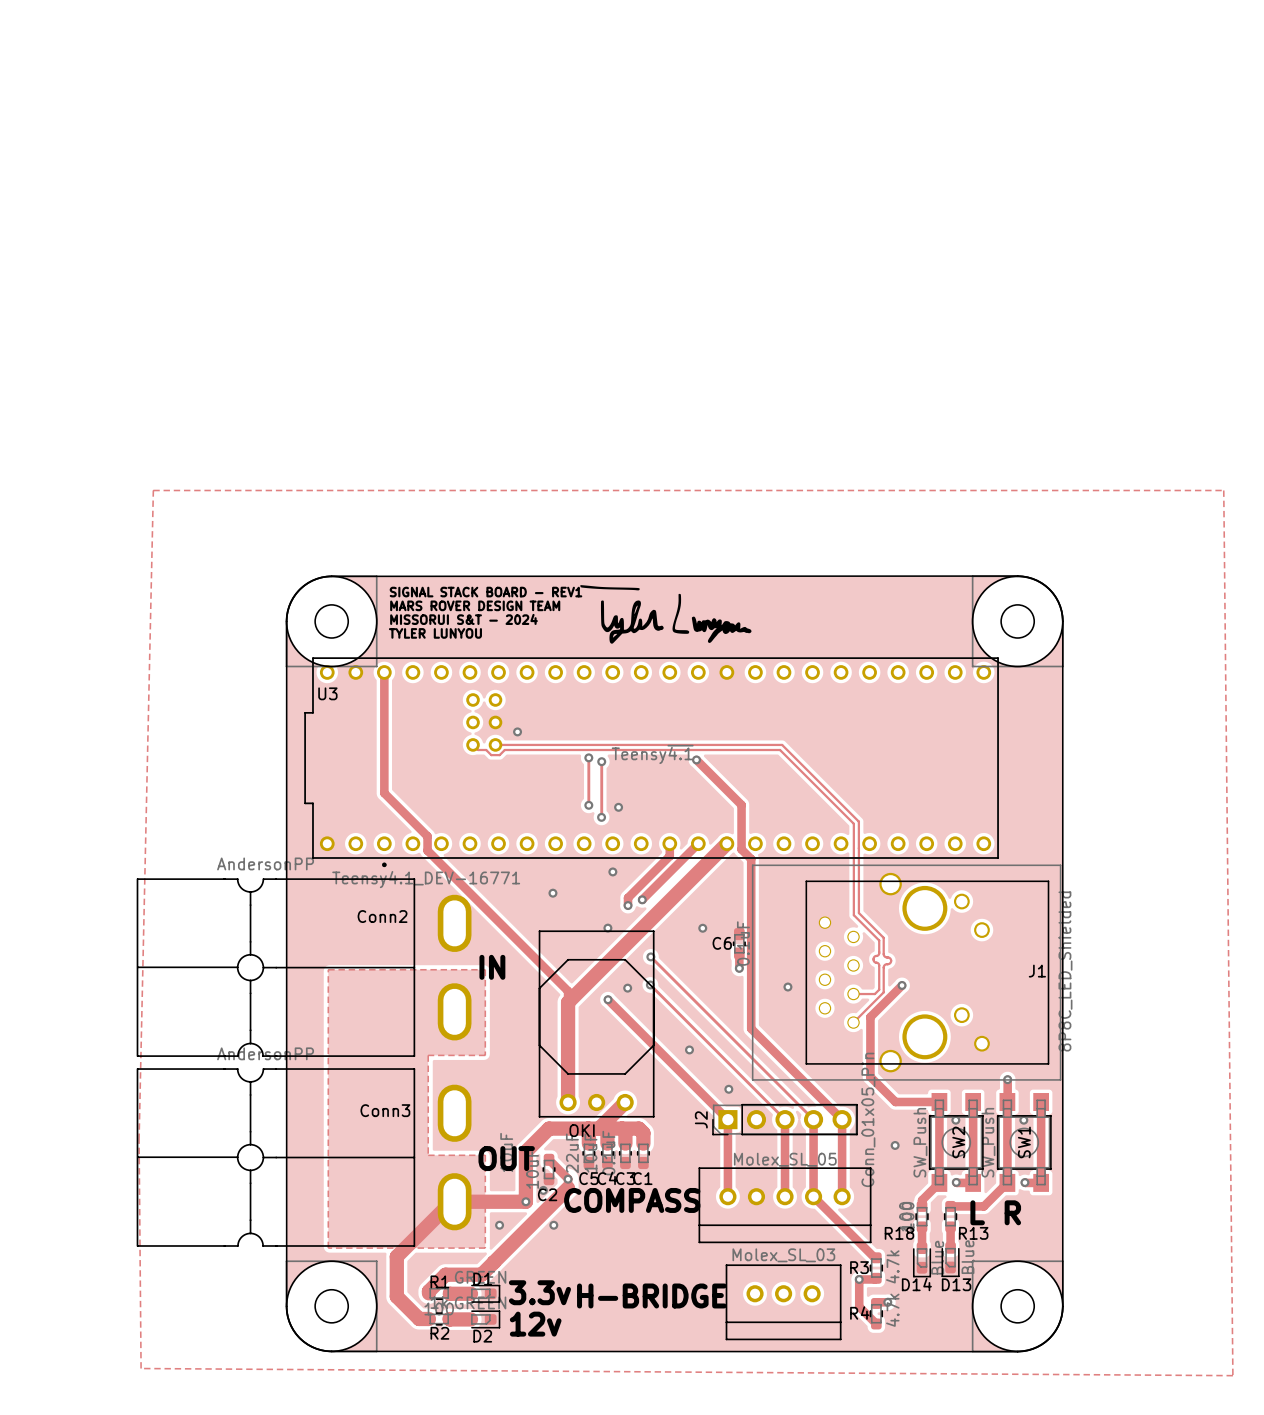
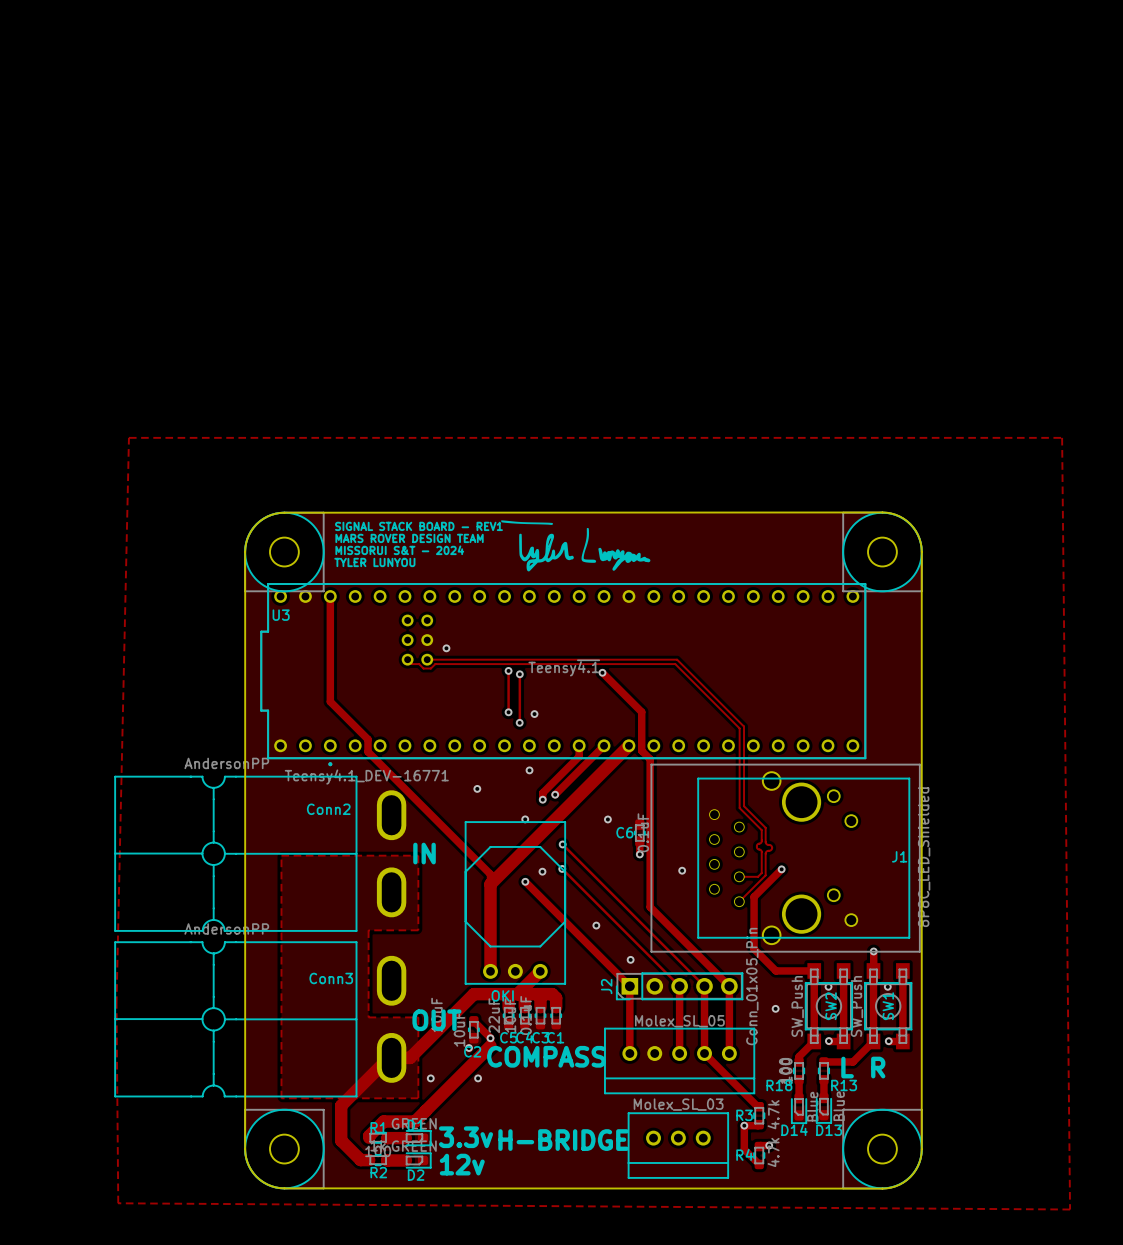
track: (525, 1151) (525, 1201) (475, 1201) -> (453, 1014) (410, 1057)
via: (525, 1201) -> none

